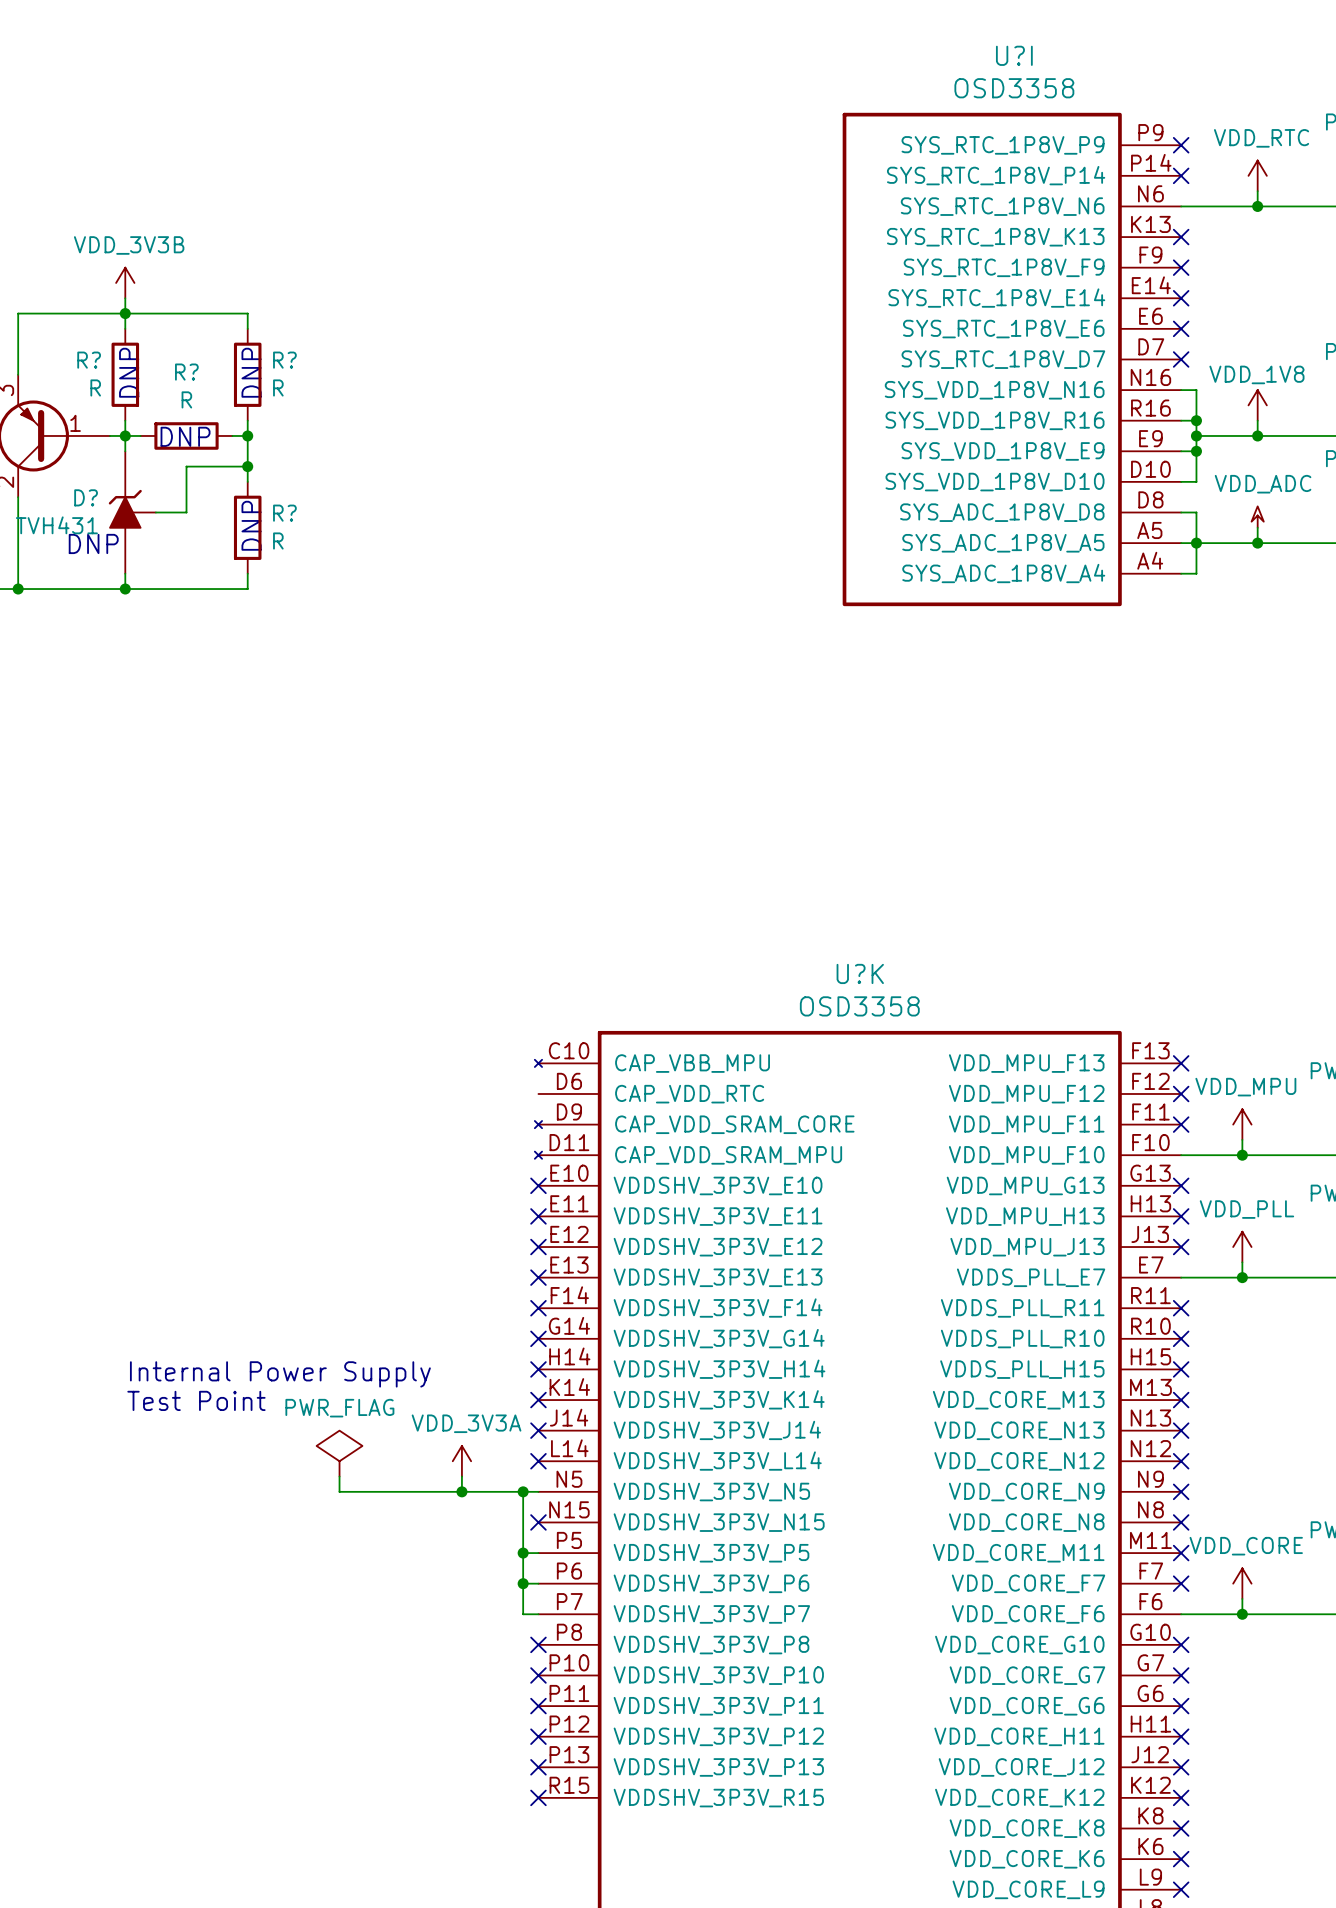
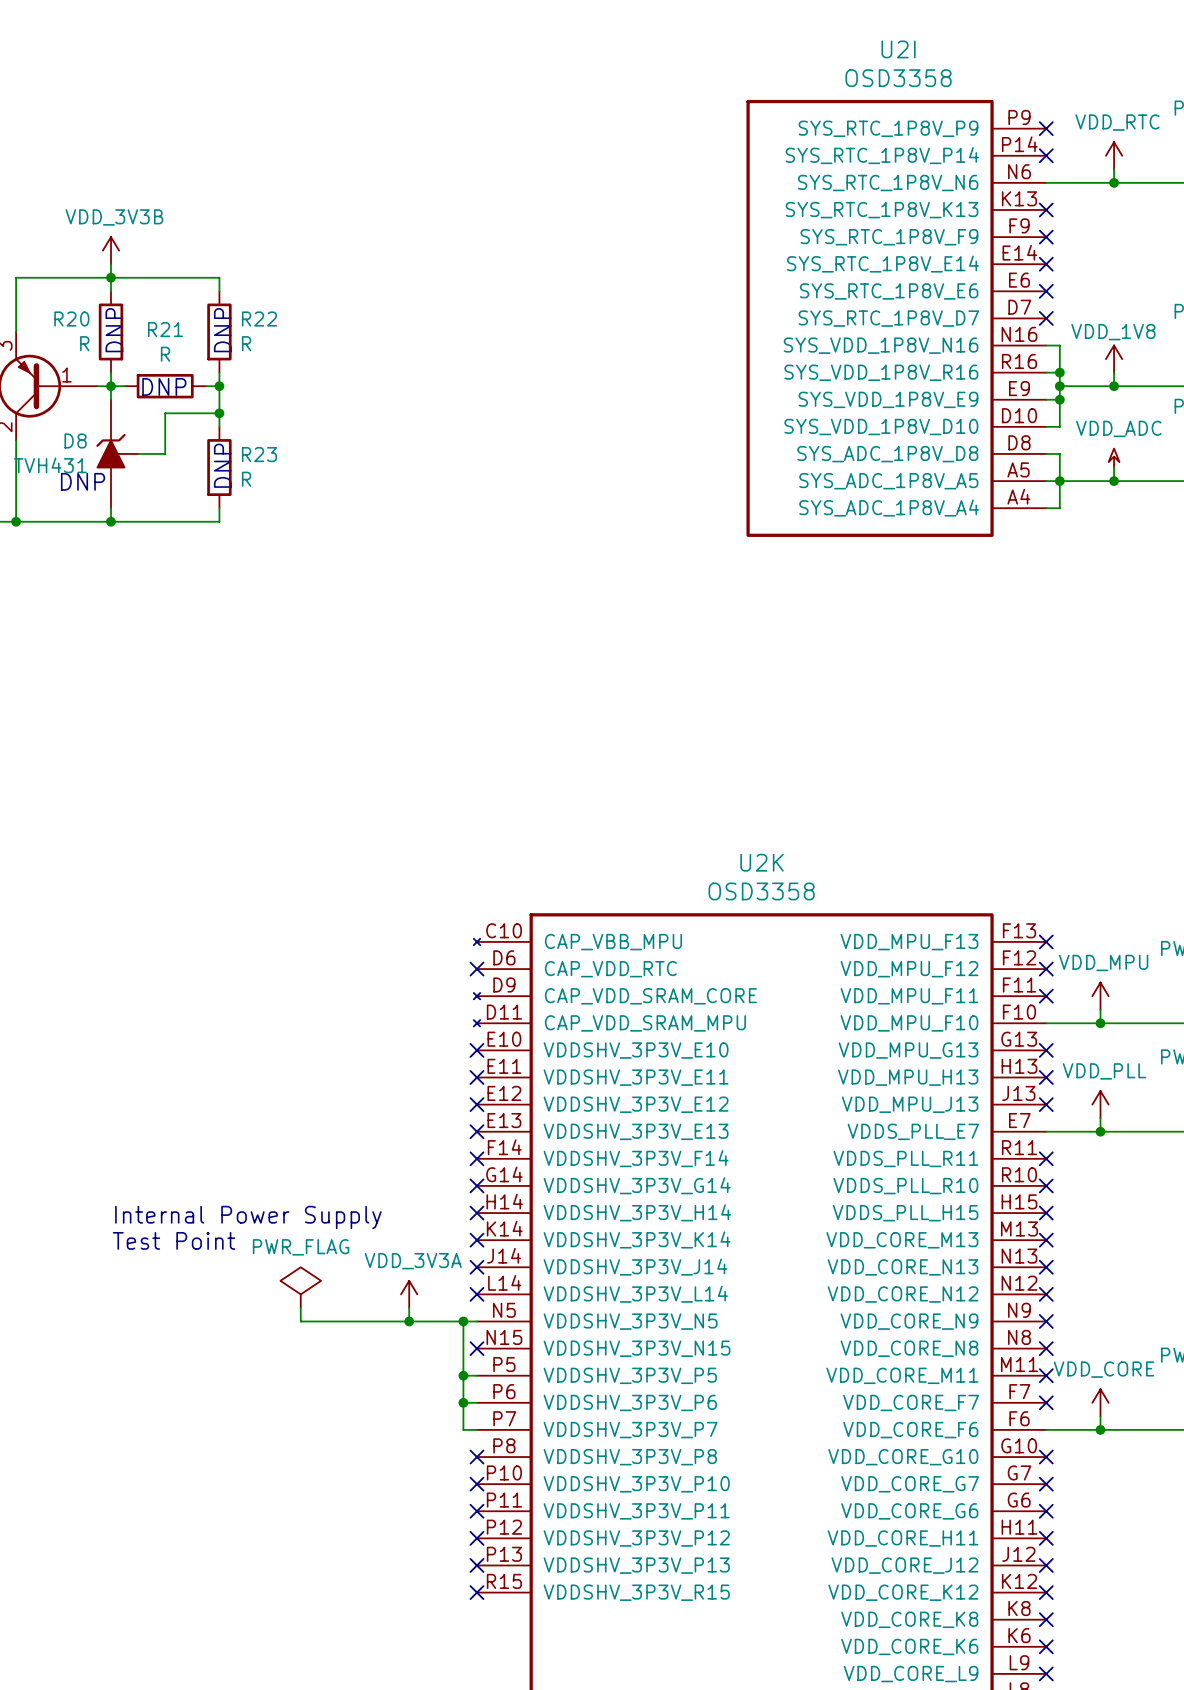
U?I name: U?I (1014, 55) -> U2I (898, 49)
R? name: R? (89, 360) -> R20 (71, 319)
R? name: R? (284, 360) -> R22 (259, 319)
R? name: R? (186, 372) -> R21 (165, 329)
D? name: D? (86, 497) -> D8 (75, 441)
R? name: R? (284, 513) -> R23 (259, 454)
U?K name: U?K (860, 973) -> U2K (762, 862)
no-connect mark: none -> (476, 969)

